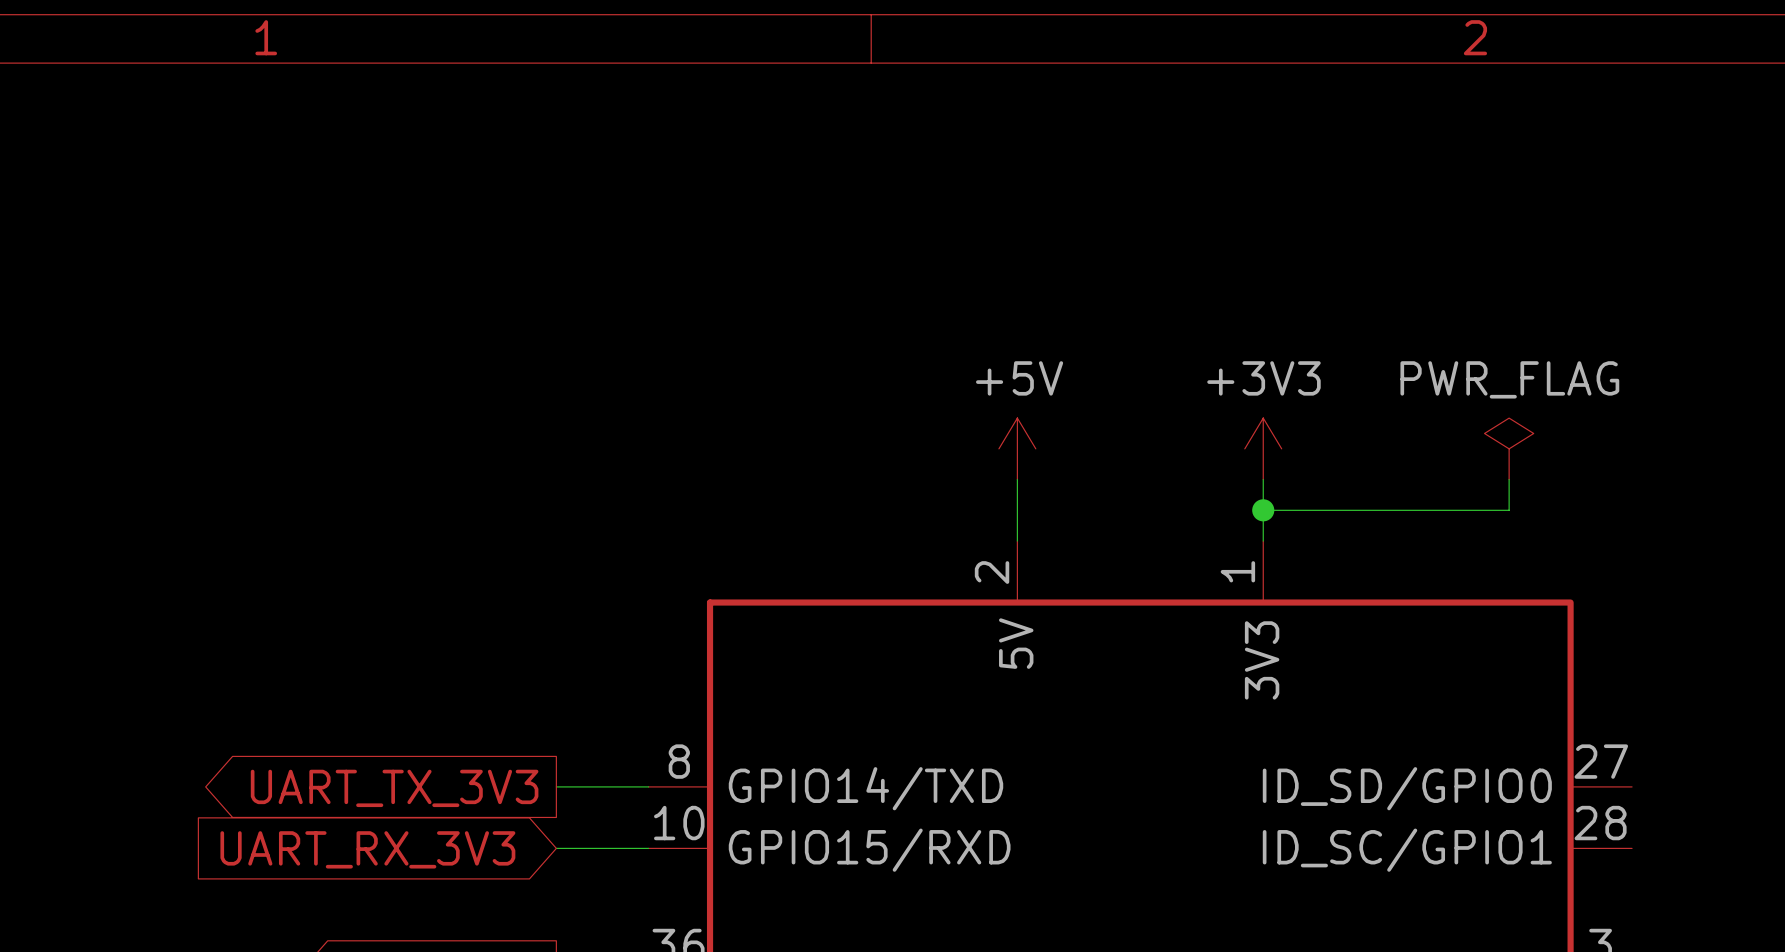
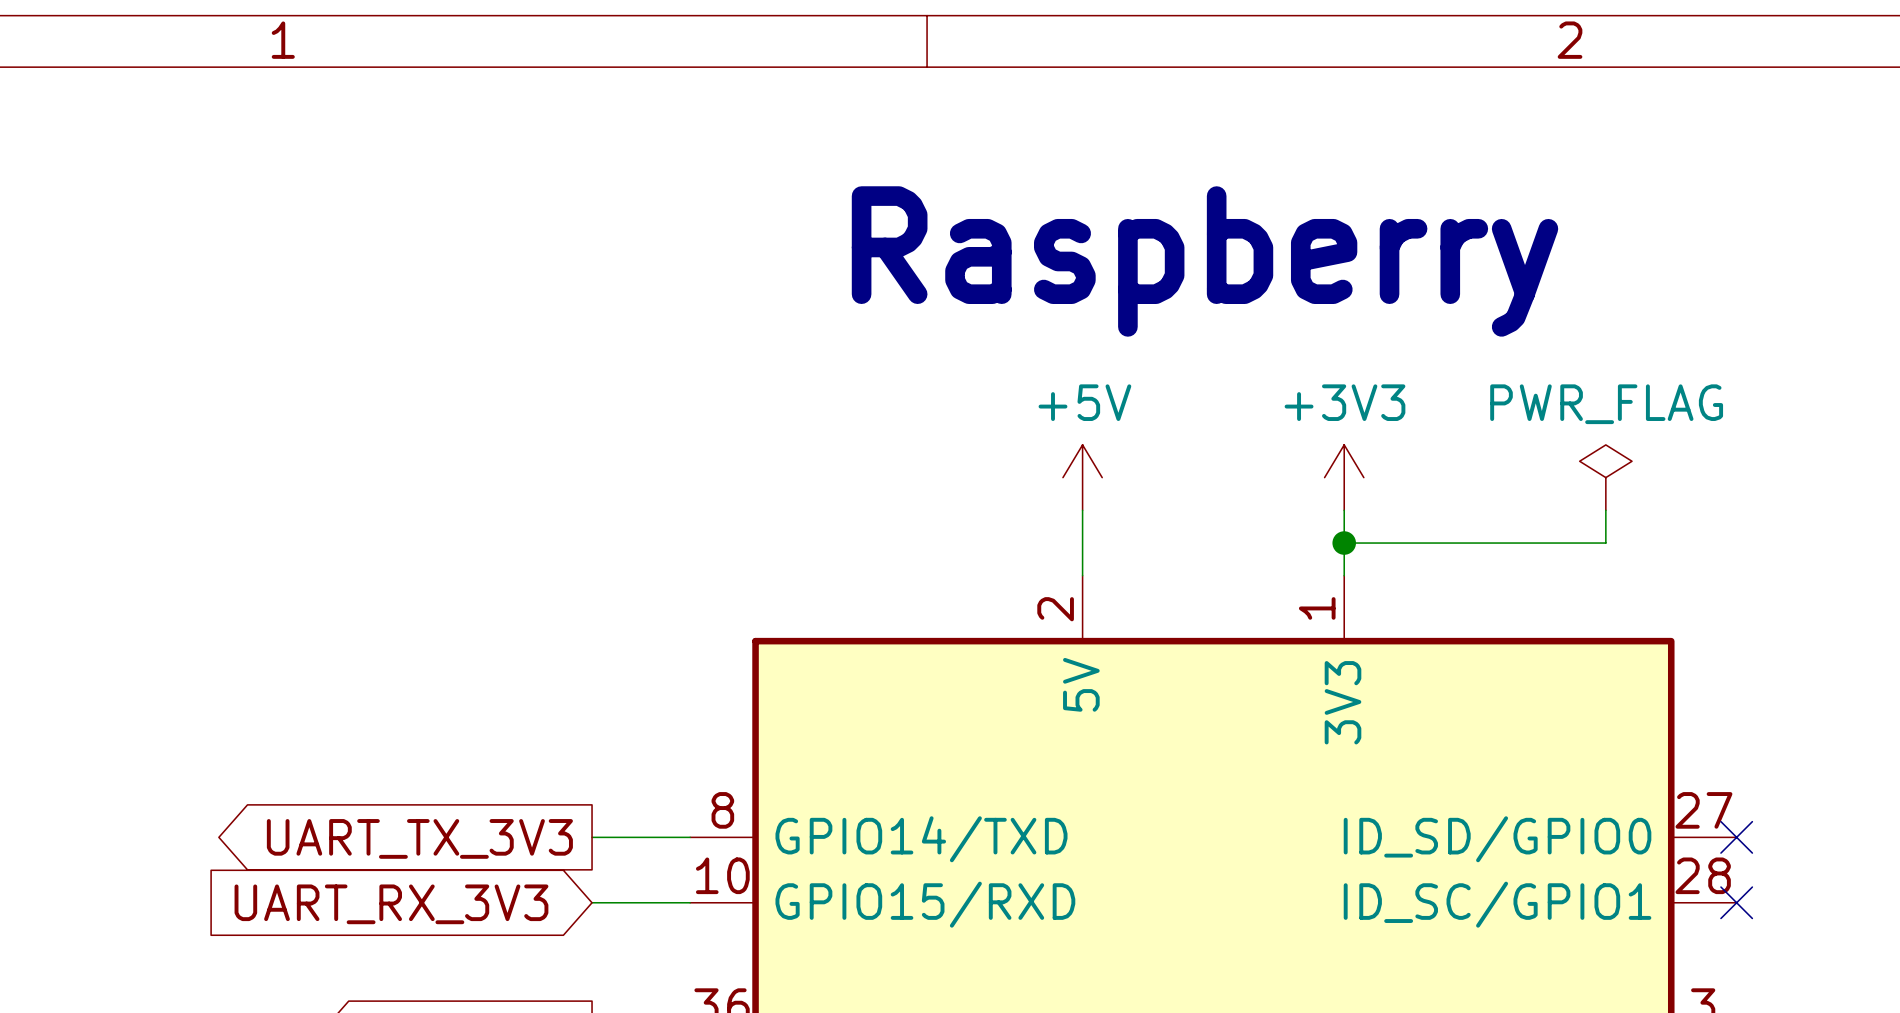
text: none -> Raspberry (1204, 261)
no-connect mark: none -> (1736, 837)
no-connect mark: none -> (1736, 902)

